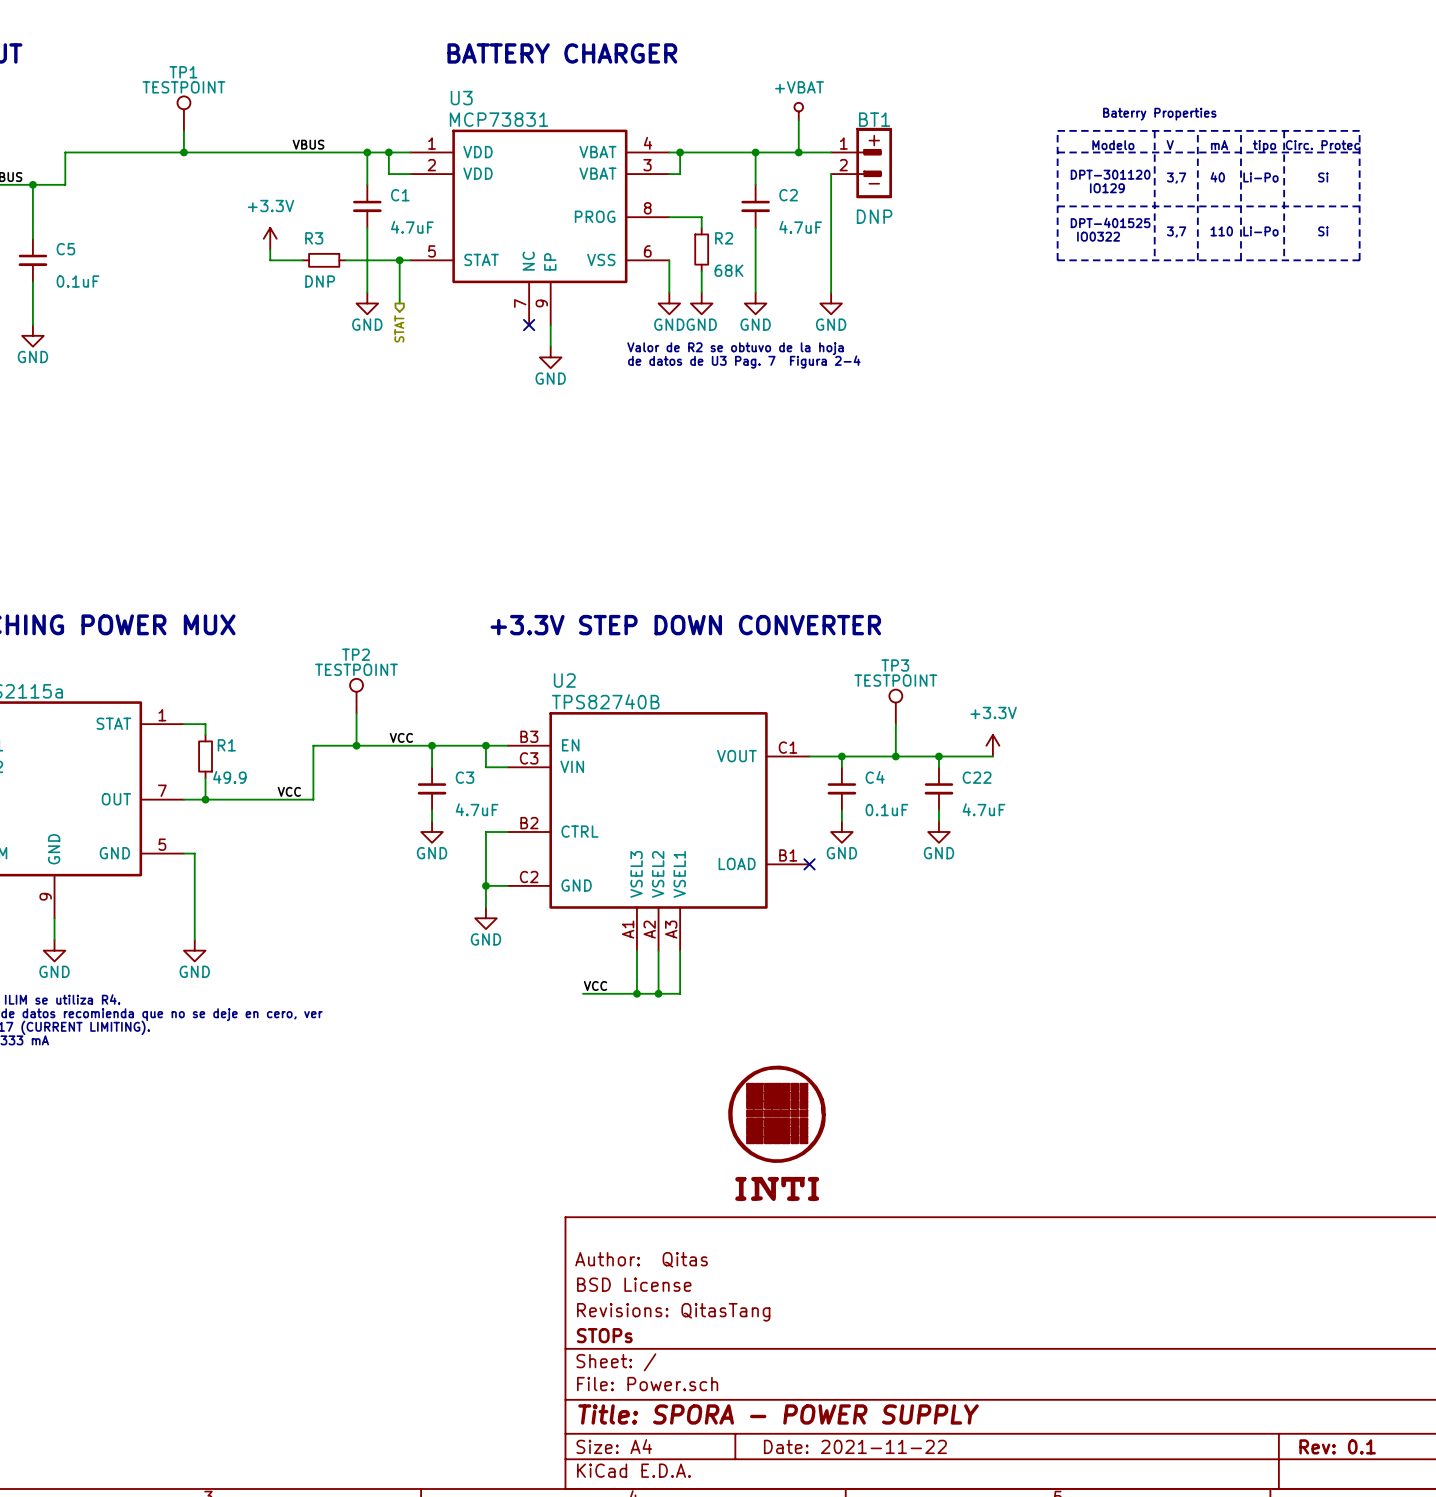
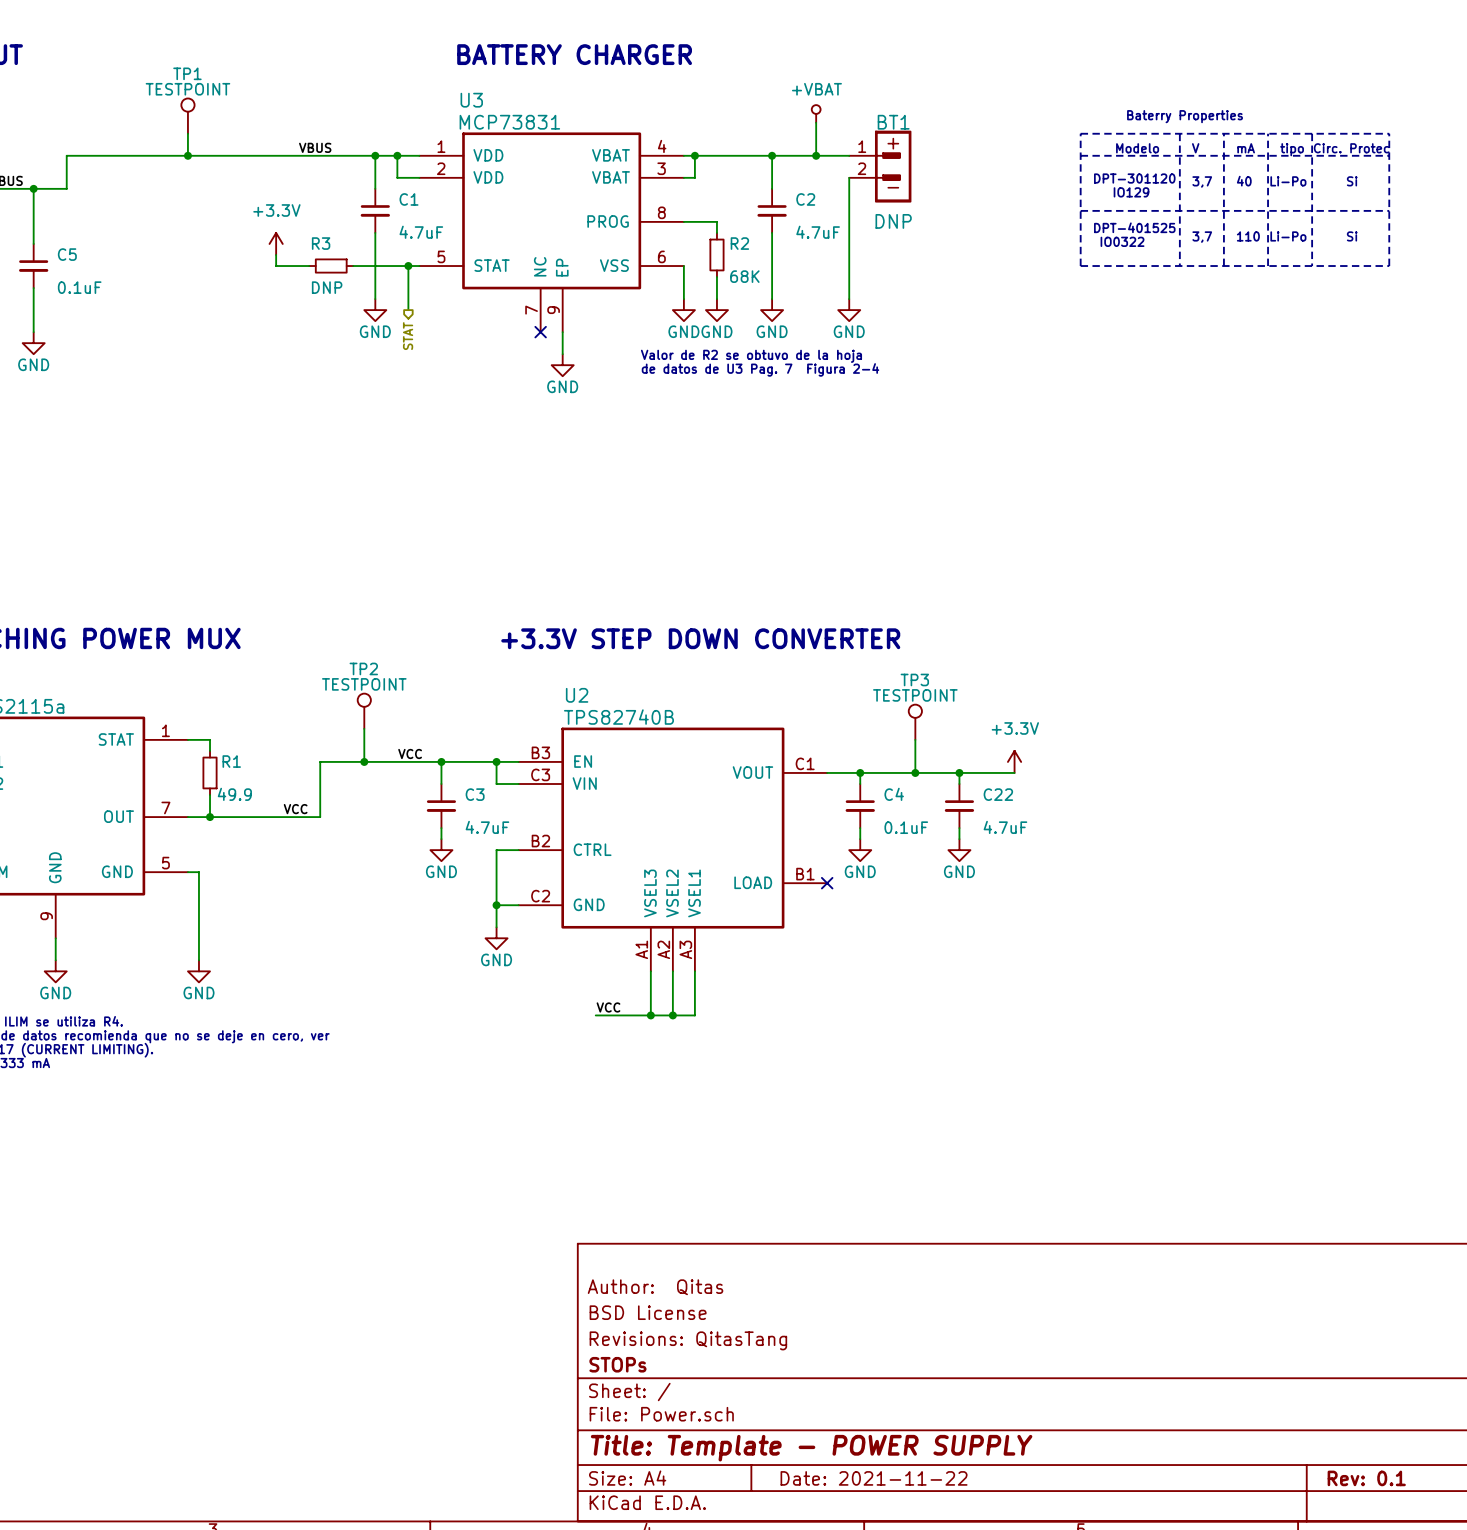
part: (776, 1133) -> none
title block: Title: SPORA - POWER SUPPLY (778, 1414) -> Title: Template - POWER SUPPLY (811, 1448)

